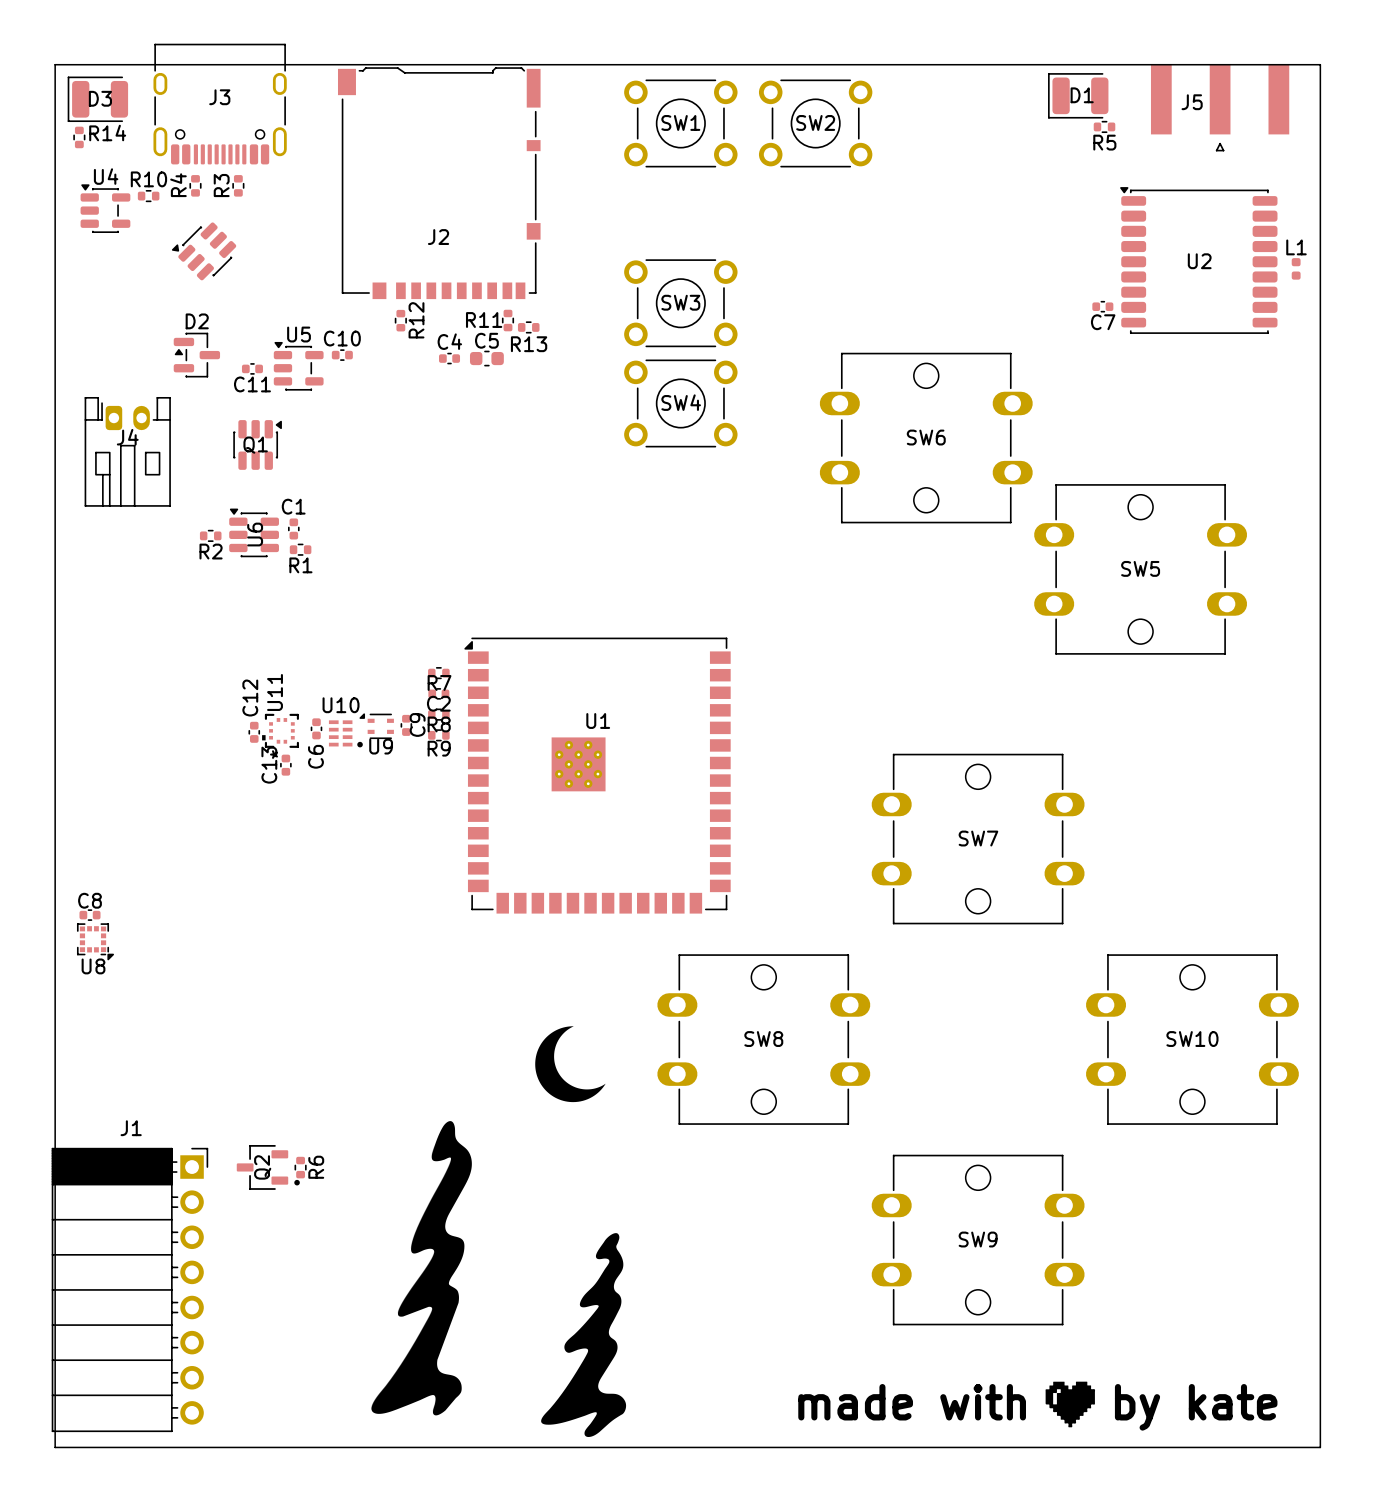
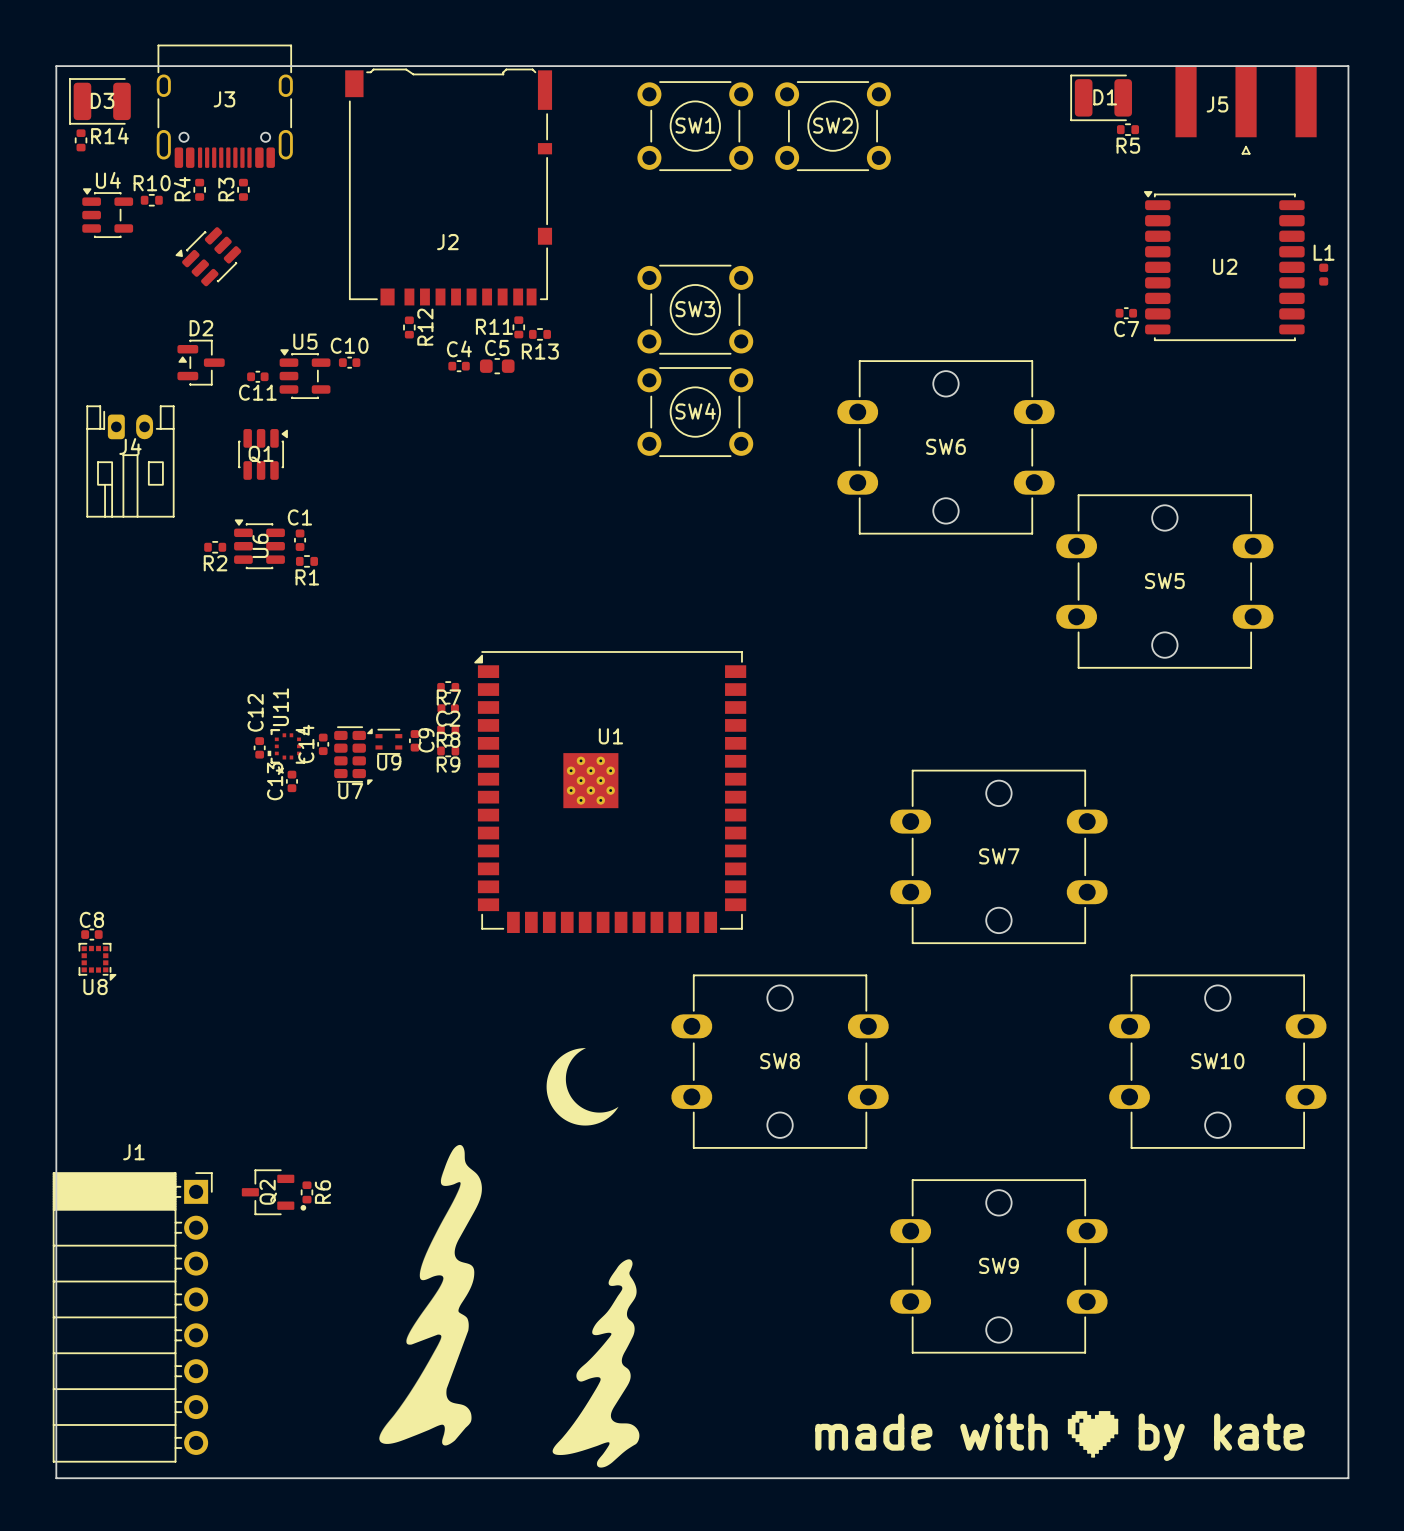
U10: (345, 733) -> none
U7: none -> (353, 755)
C6 name: C6 (315, 756) -> C14 (305, 744)

